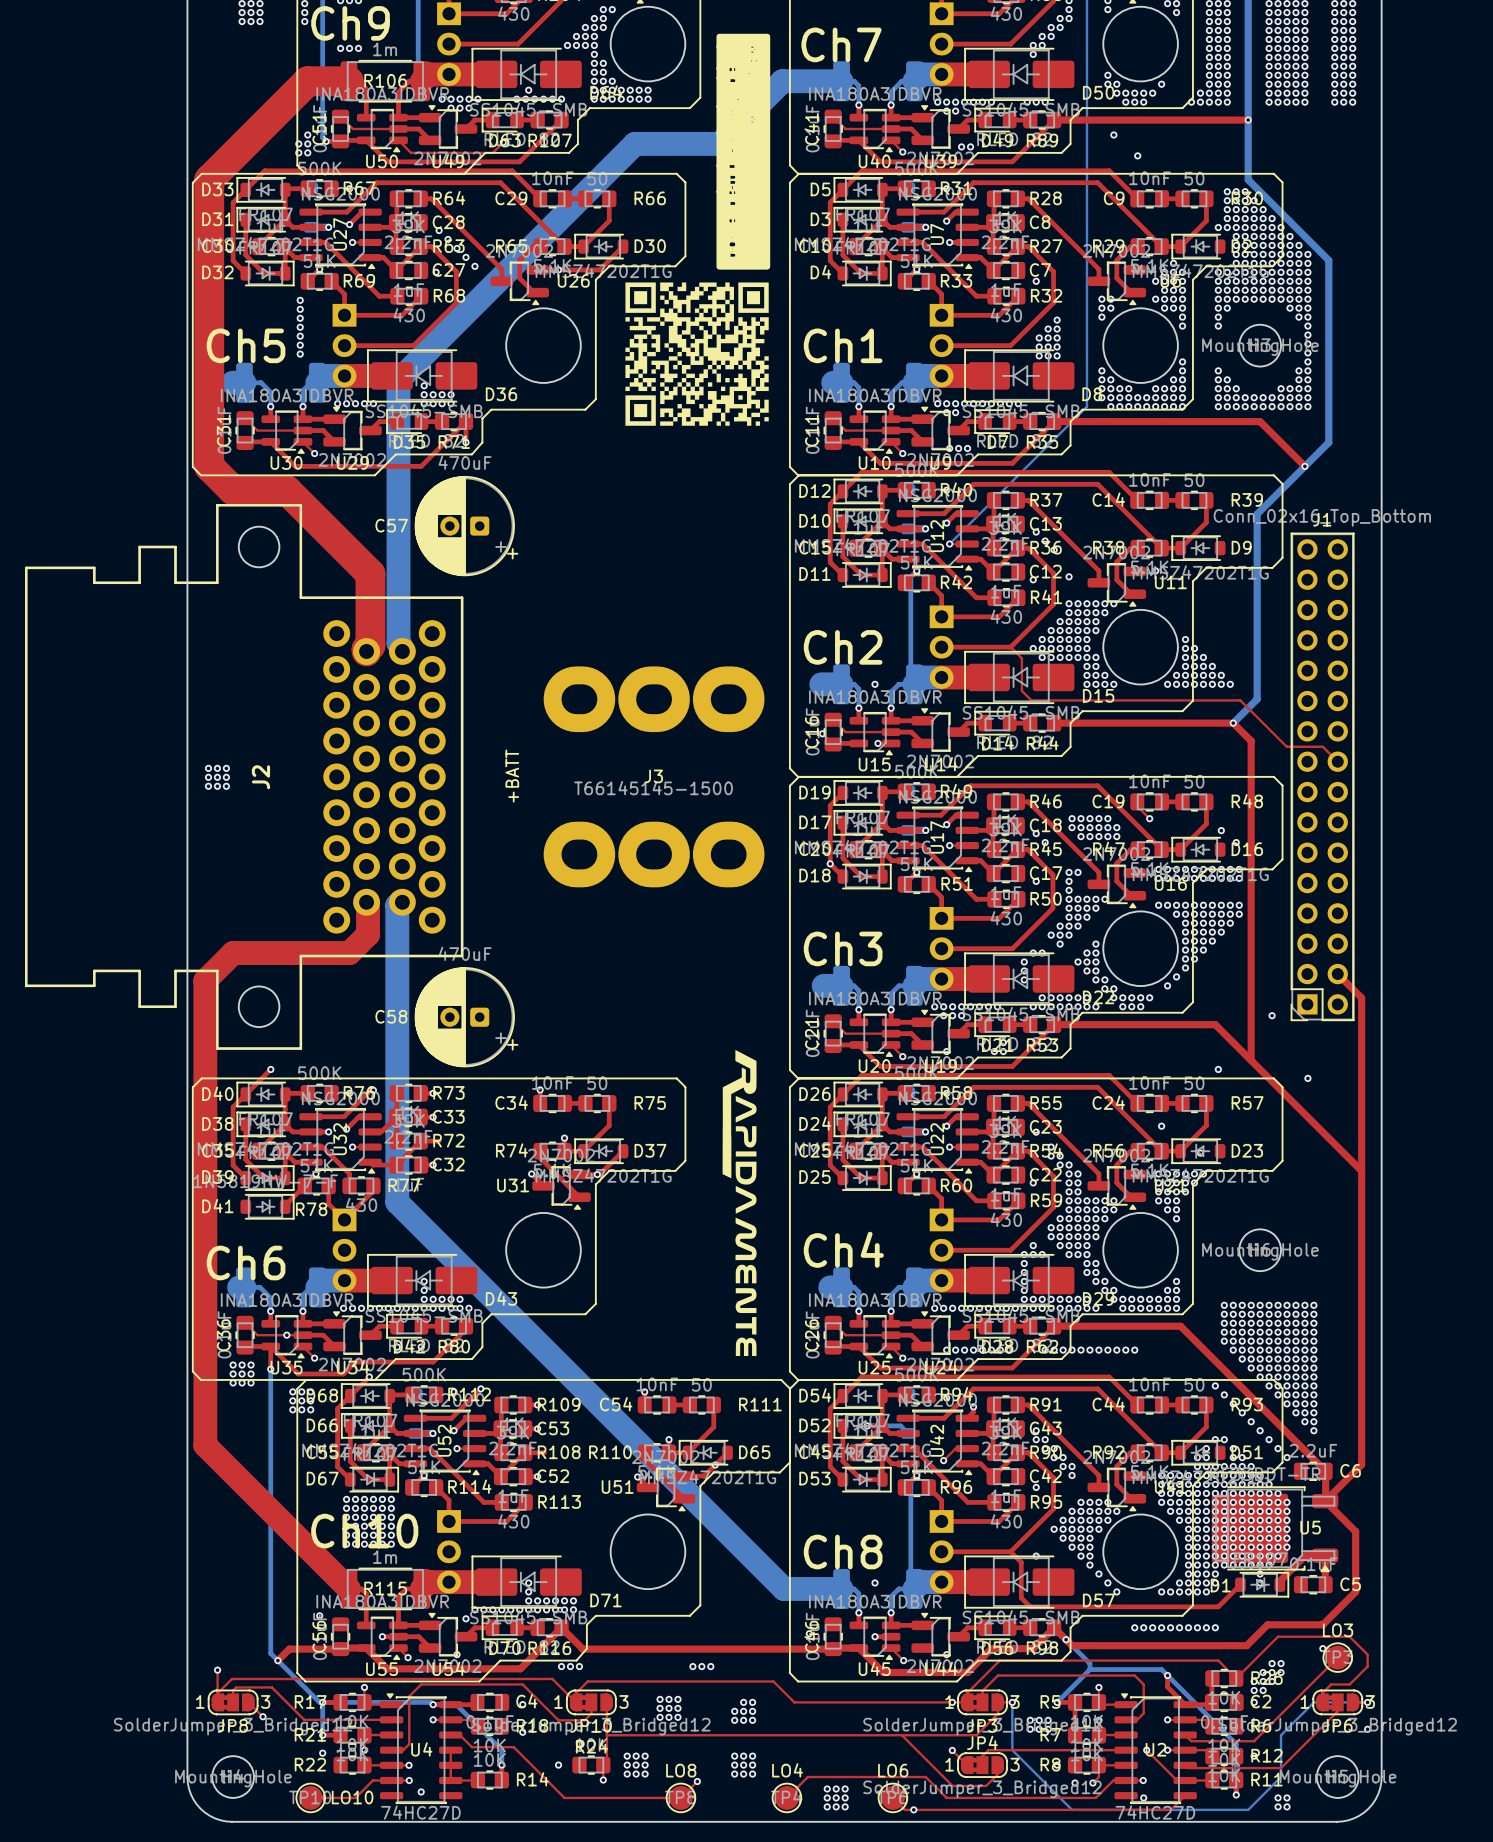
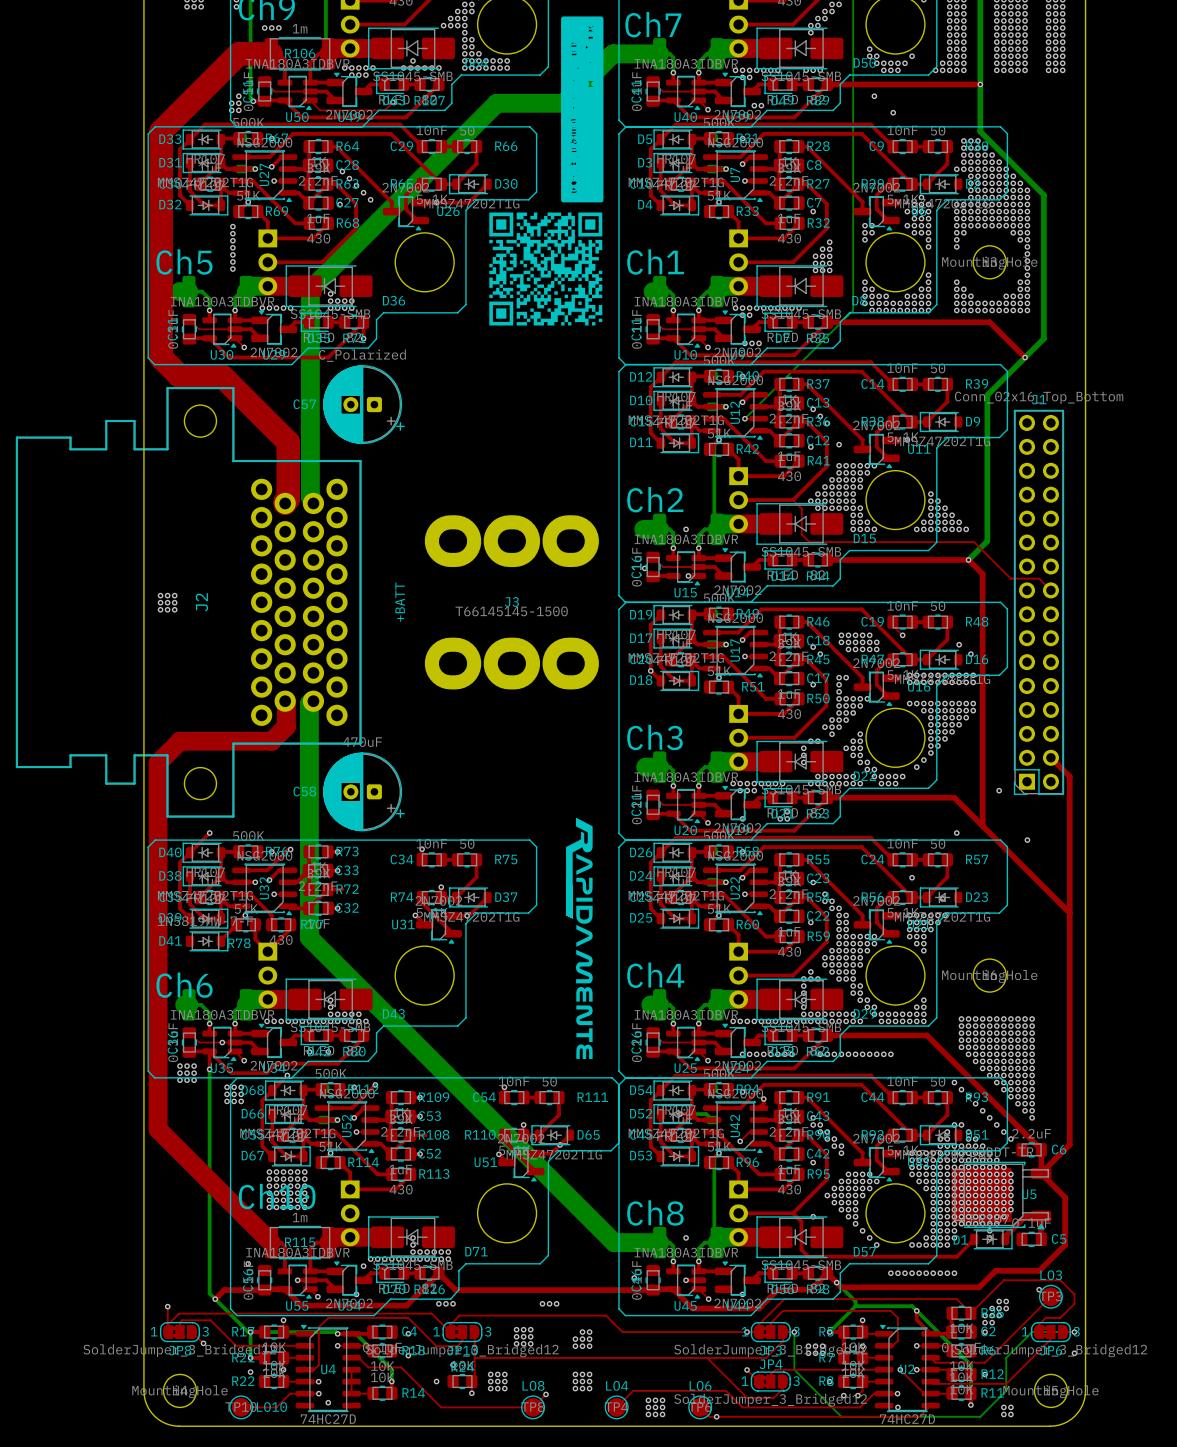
C57 value: 470uF (465, 462) -> C_Polarized (362, 355)

